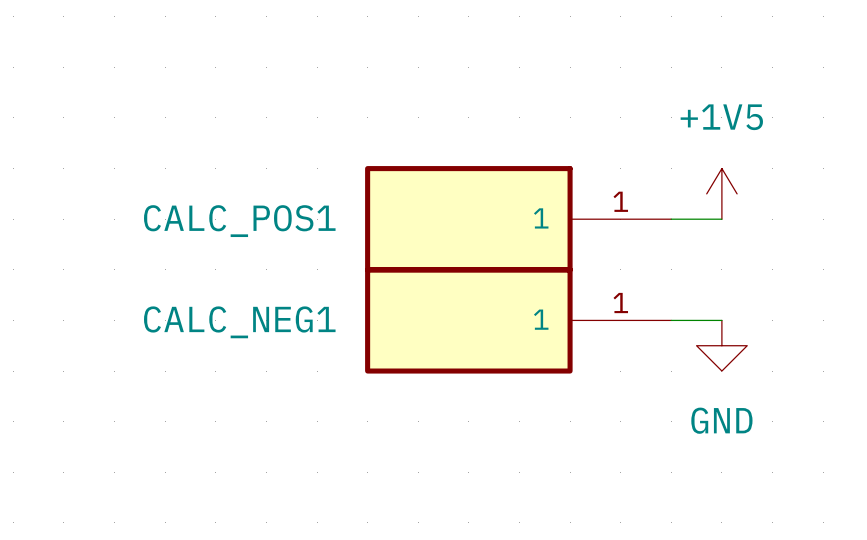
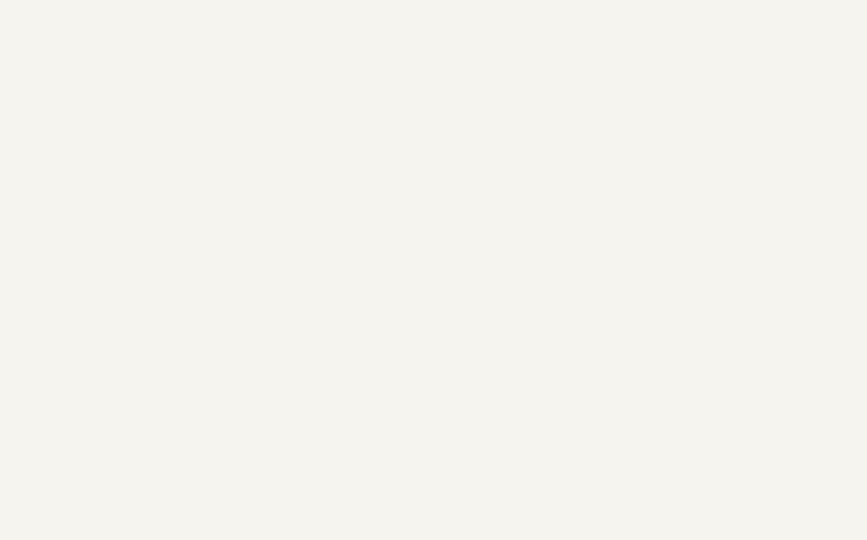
power symbol: +1V5 (721, 193) -> none
CALC_POS1: (518, 219) -> none
wire: (671, 219) (721, 219) -> none
CALC_NEG1: (518, 320) -> none
wire: (671, 320) (721, 320) -> none
power symbol: GND (721, 345) -> none

